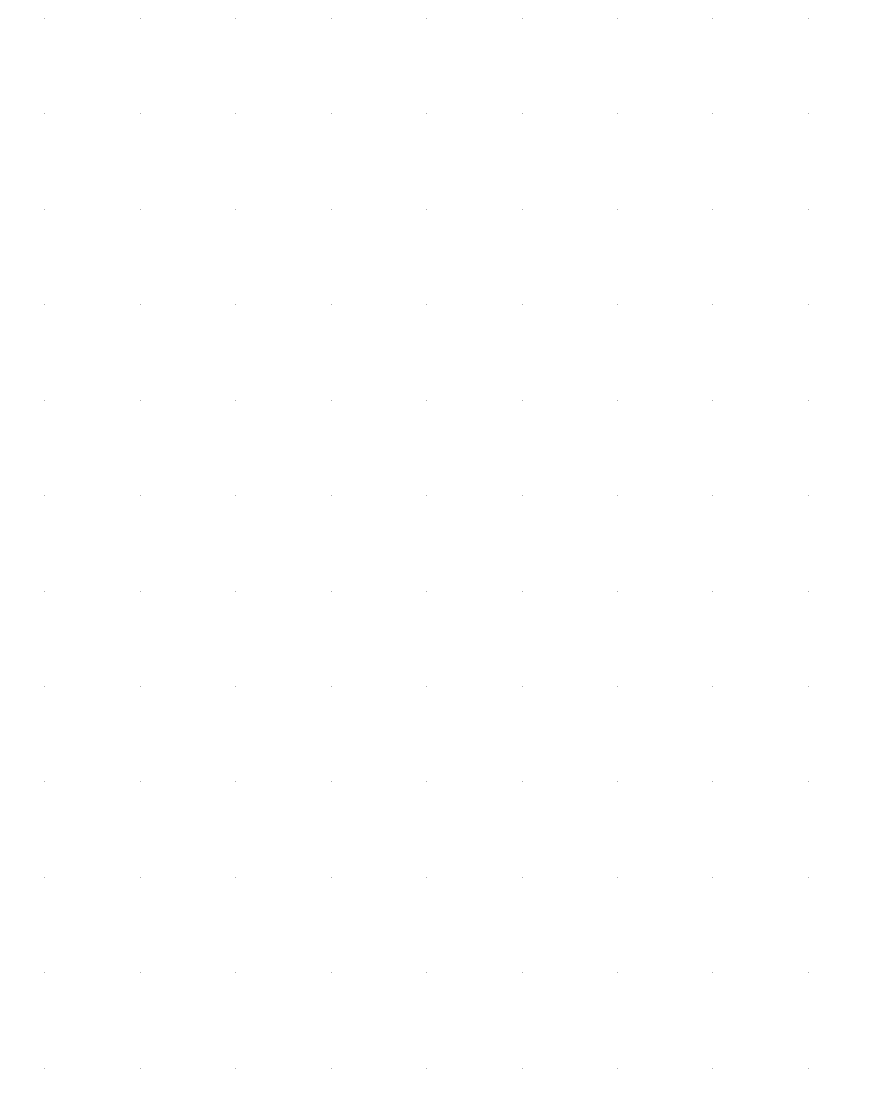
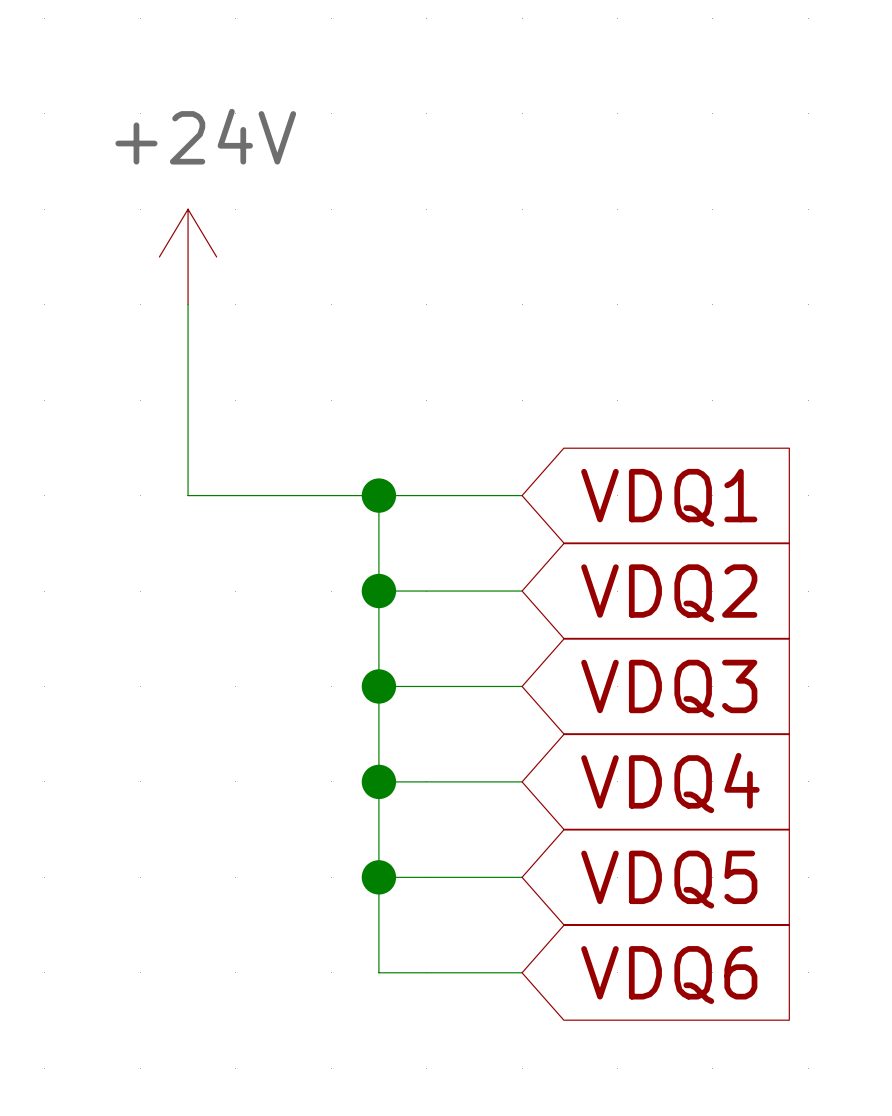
power symbol: none -> +24V (188, 256)
wire: none -> (188, 304) (188, 495) (522, 495)
wire: none -> (378, 495) (378, 972) (522, 972)
junction: none -> (378, 495)
global label: none -> VDQ1 (669, 497)
wire: none -> (378, 591) (522, 591)
junction: none -> (378, 591)
global label: none -> VDQ2 (669, 593)
wire: none -> (378, 686) (522, 686)
junction: none -> (378, 686)
global label: none -> VDQ3 (669, 688)
wire: none -> (378, 781) (522, 781)
junction: none -> (378, 781)
global label: none -> VDQ4 (670, 783)
wire: none -> (378, 877) (522, 877)
junction: none -> (378, 877)
global label: none -> VDQ5 (669, 879)
global label: none -> VDQ6 (669, 975)

